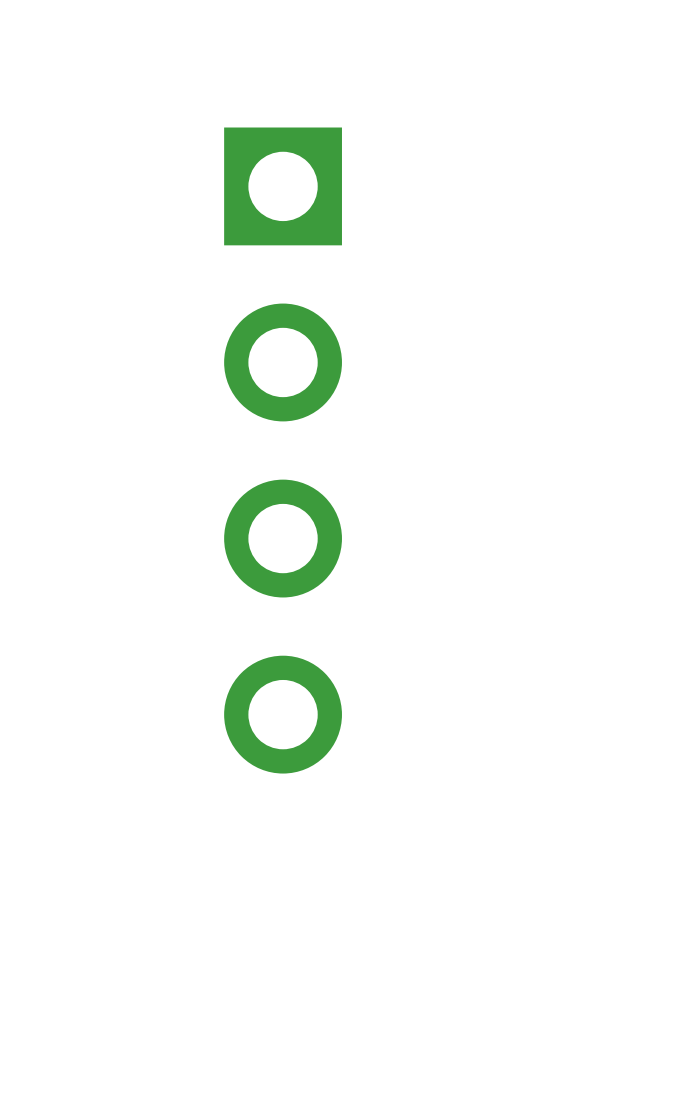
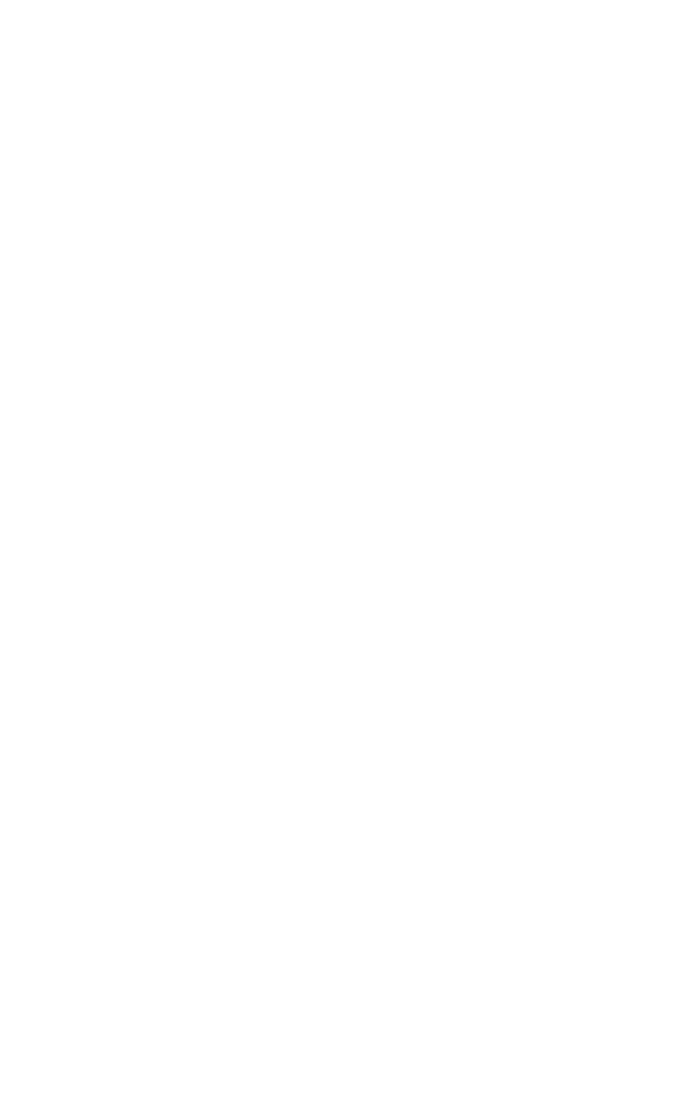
part: (283, 450) -> none

